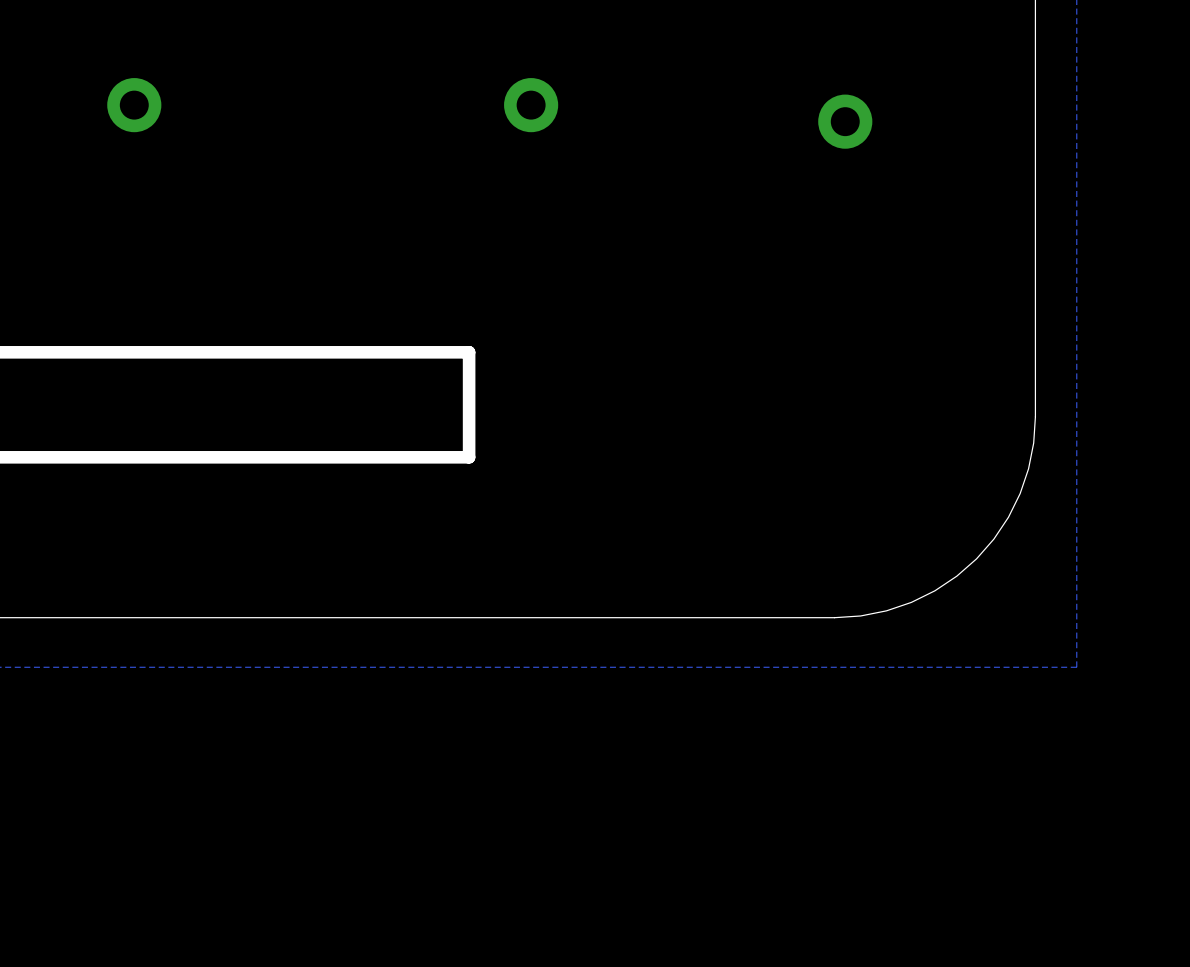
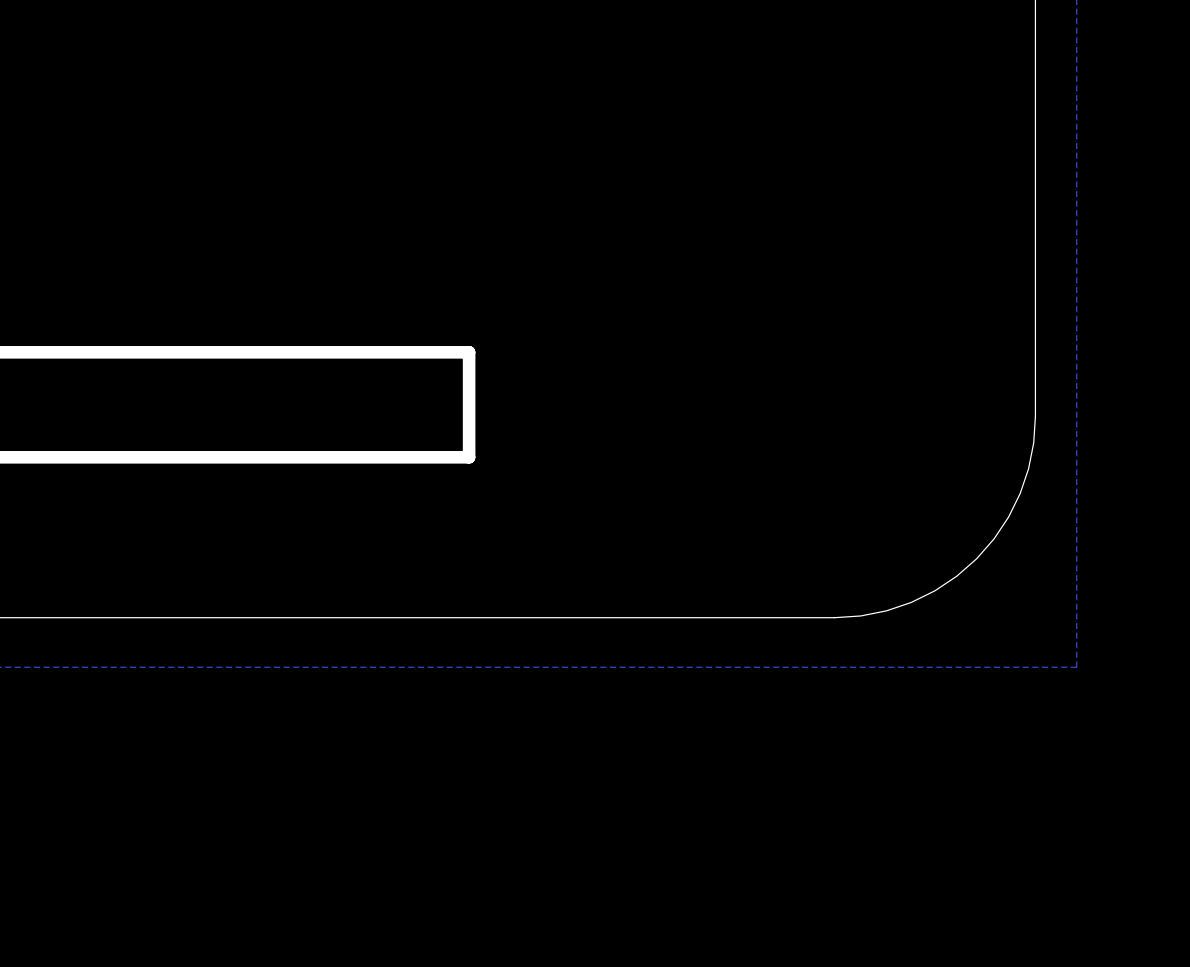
via: (134, 105) -> none
via: (531, 105) -> none
via: (845, 121) -> none

